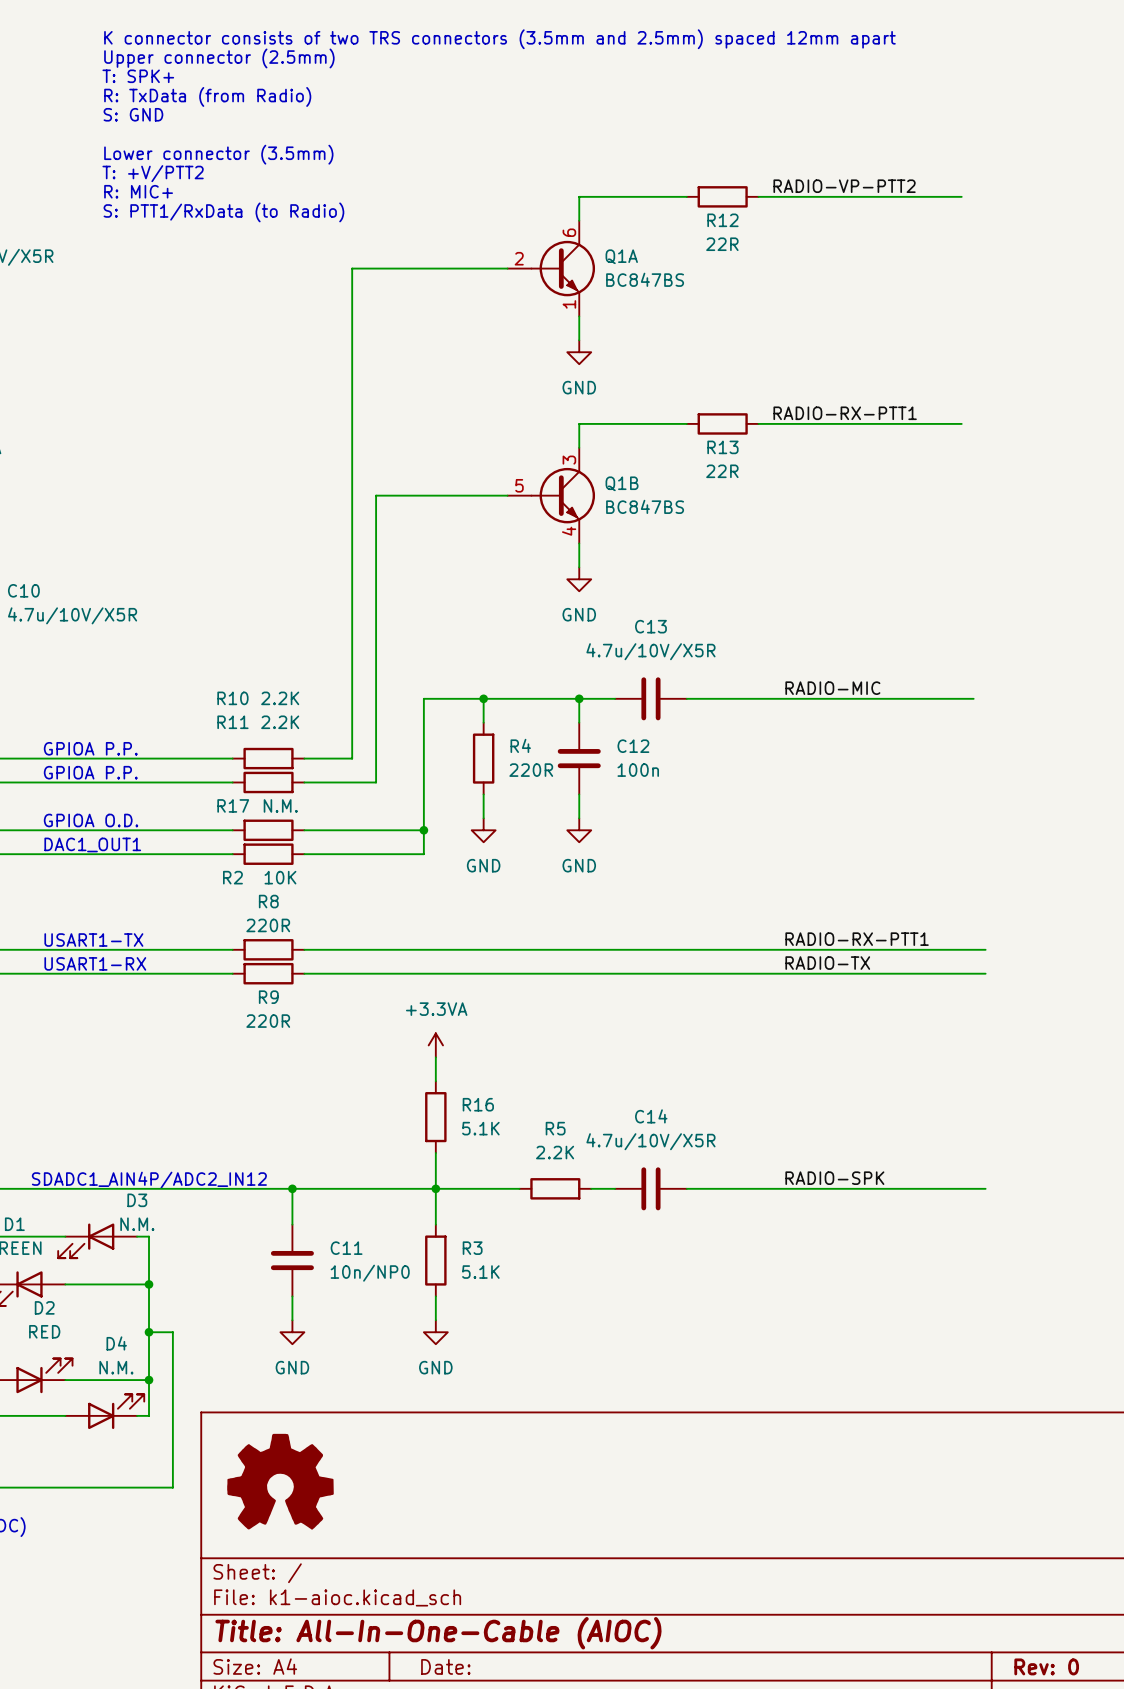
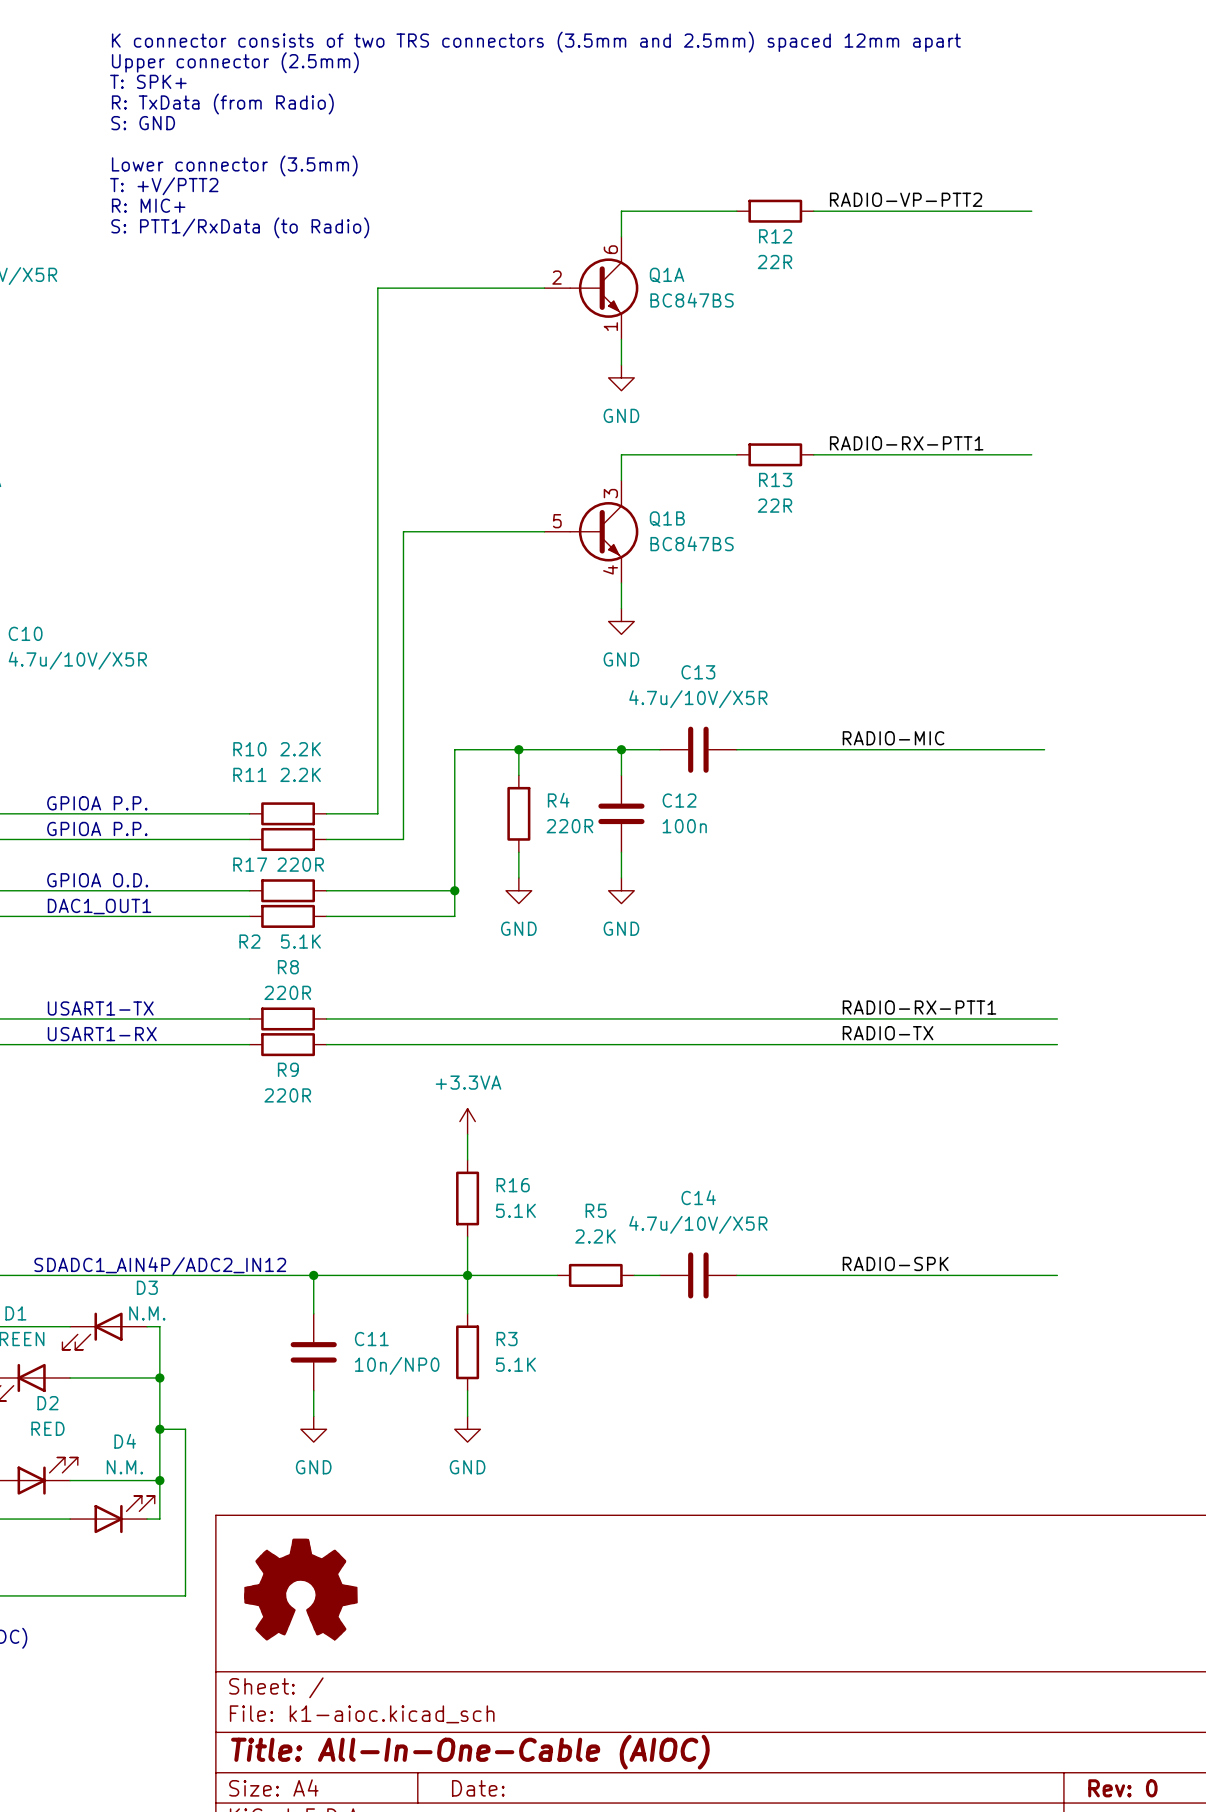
R17 value: N.M. (280, 805) -> 220R (300, 864)
R2 value: 10K (280, 877) -> 5.1K (300, 941)

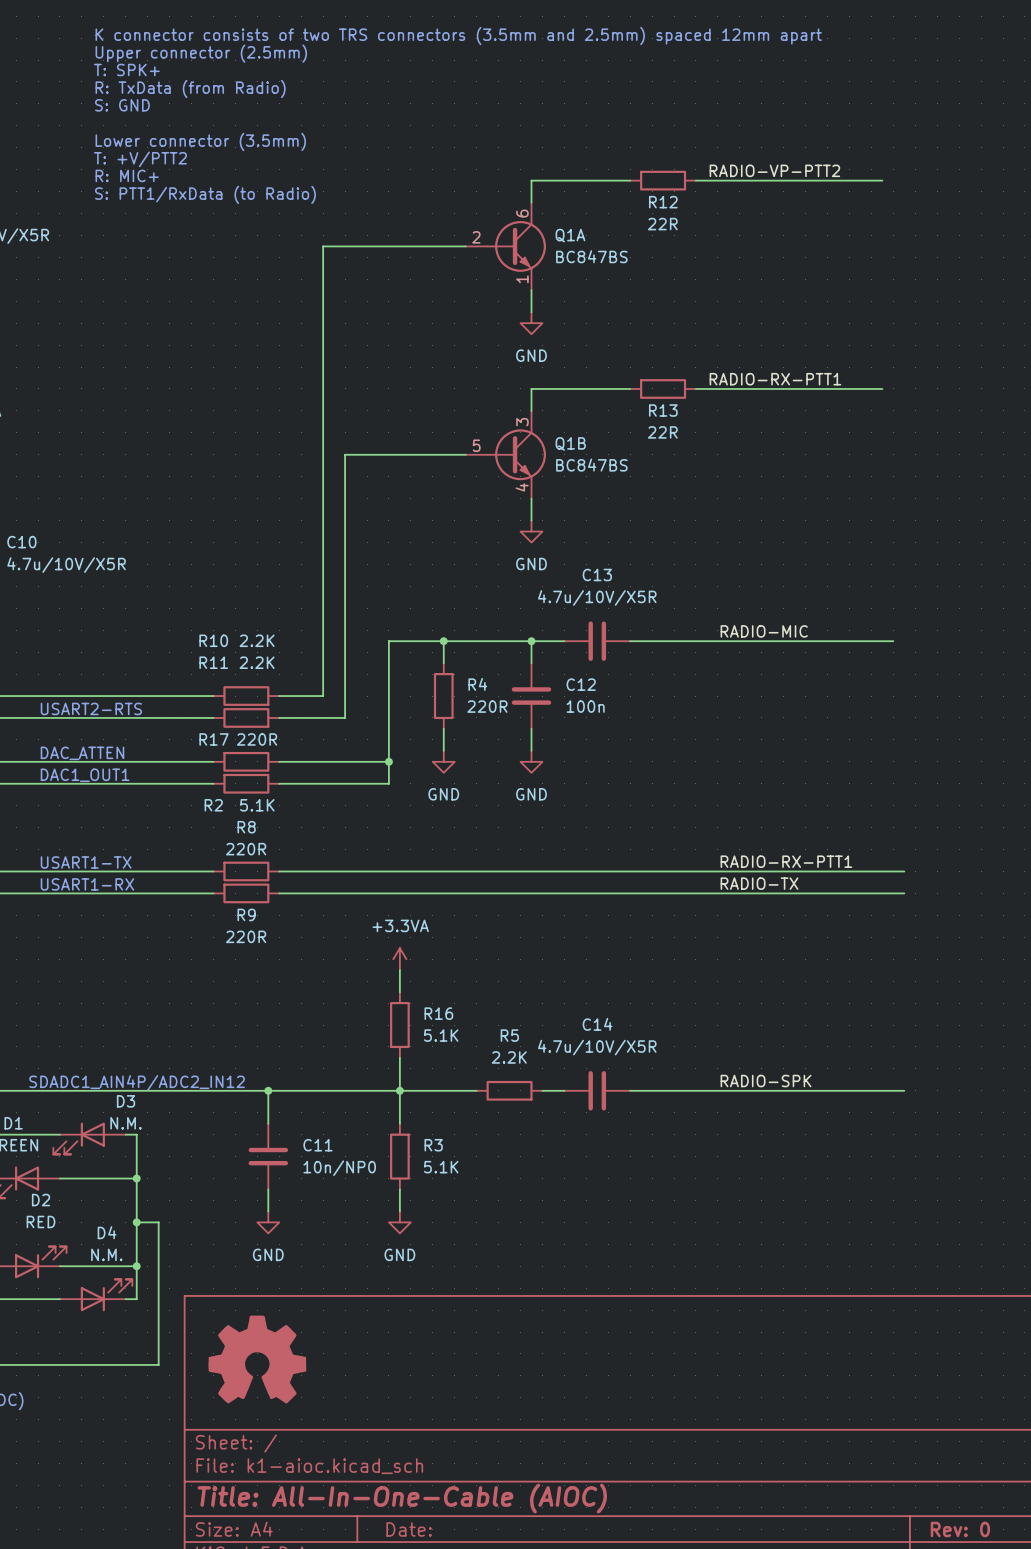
text: GPIOA P.P. (97, 803) -> none
text: GPIOA P.P. (97, 828) -> USART2-RTS (91, 708)
text: GPIOA O.D. (97, 880) -> DAC_ATTEN (82, 753)

